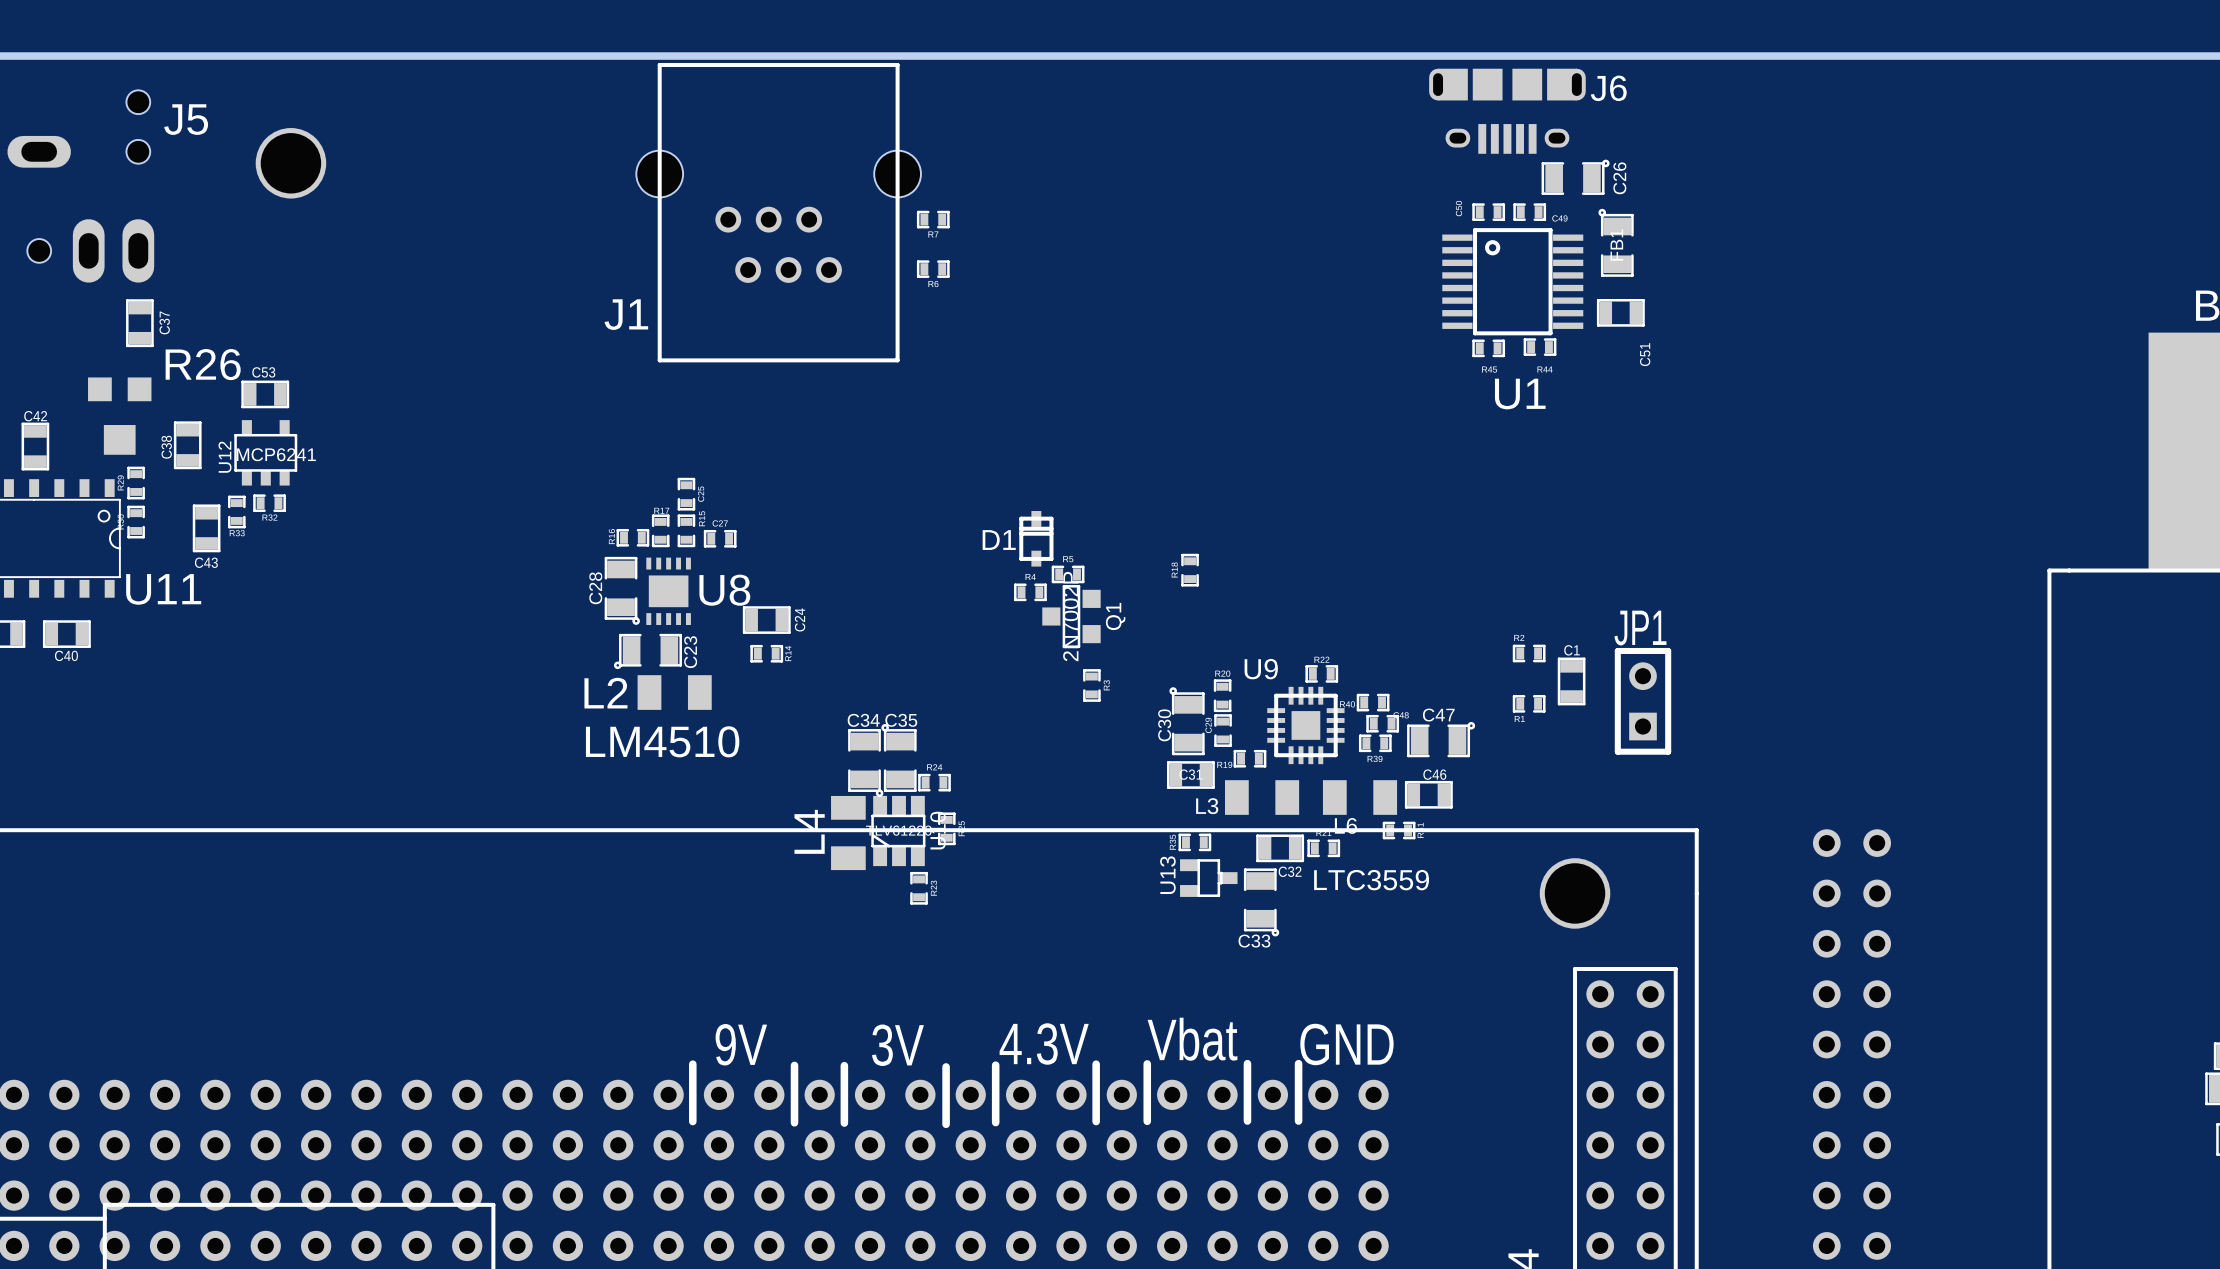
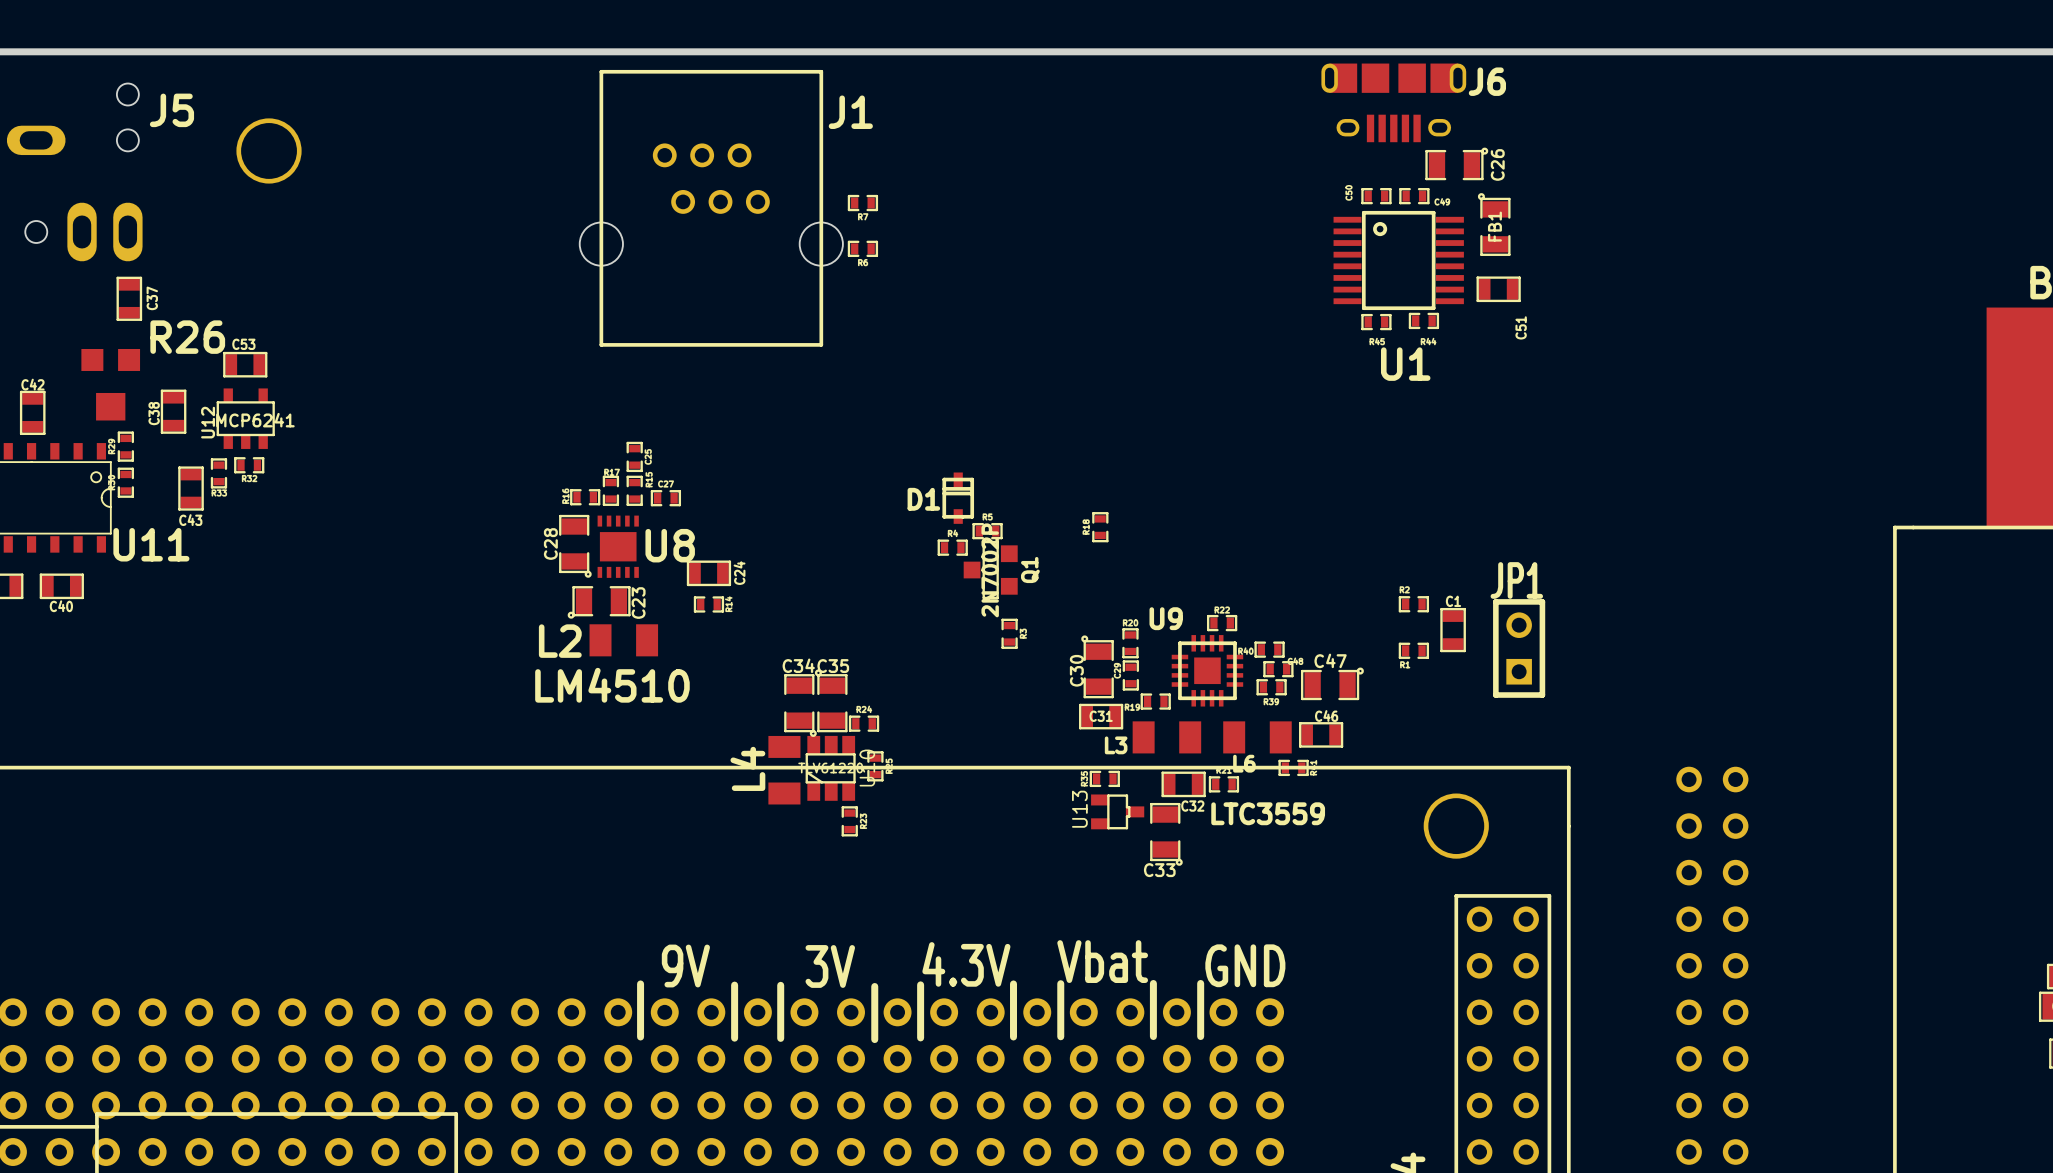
J1 rotation: 0° (778, 212) -> 180° (711, 208)

